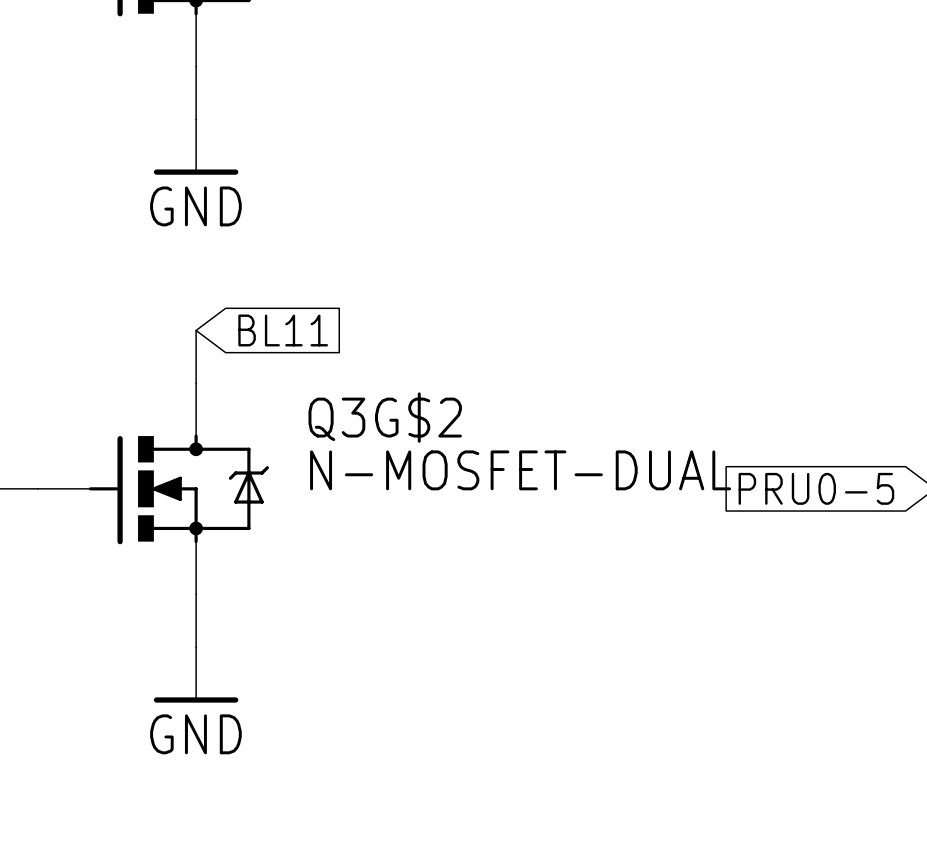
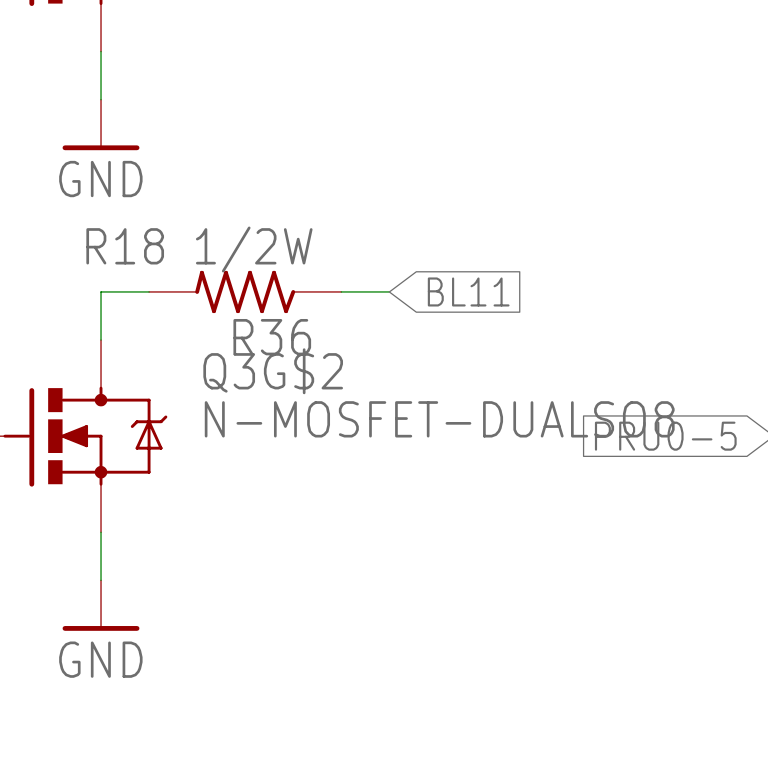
wire: none -> (101, 291) (149, 291)
global label position: BL11 (283, 330) -> BL11 (468, 291)
R36: none -> R18 1/2W (245, 291)
wire: none -> (341, 291) (389, 291)
Q3G$2 value: N-MOSFET-DUAL (520, 470) -> N-MOSFET-DUALSO8 (439, 419)

